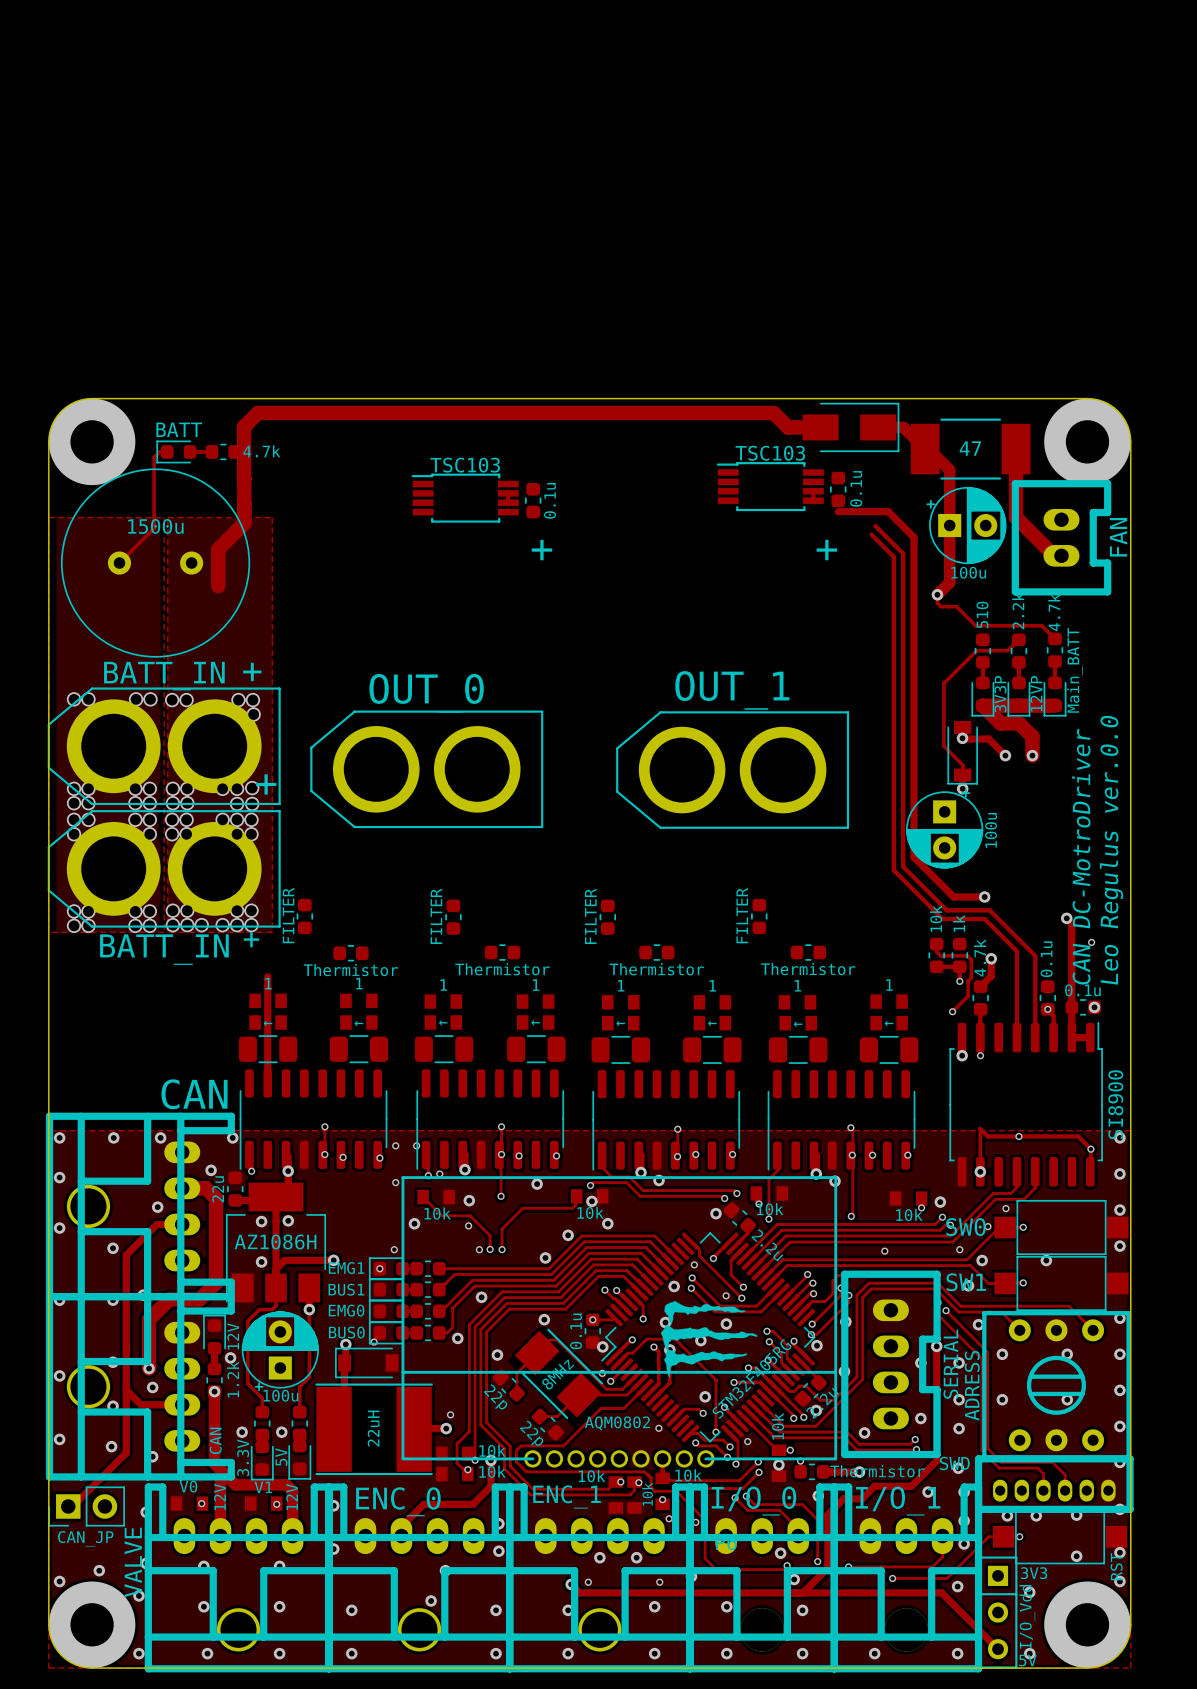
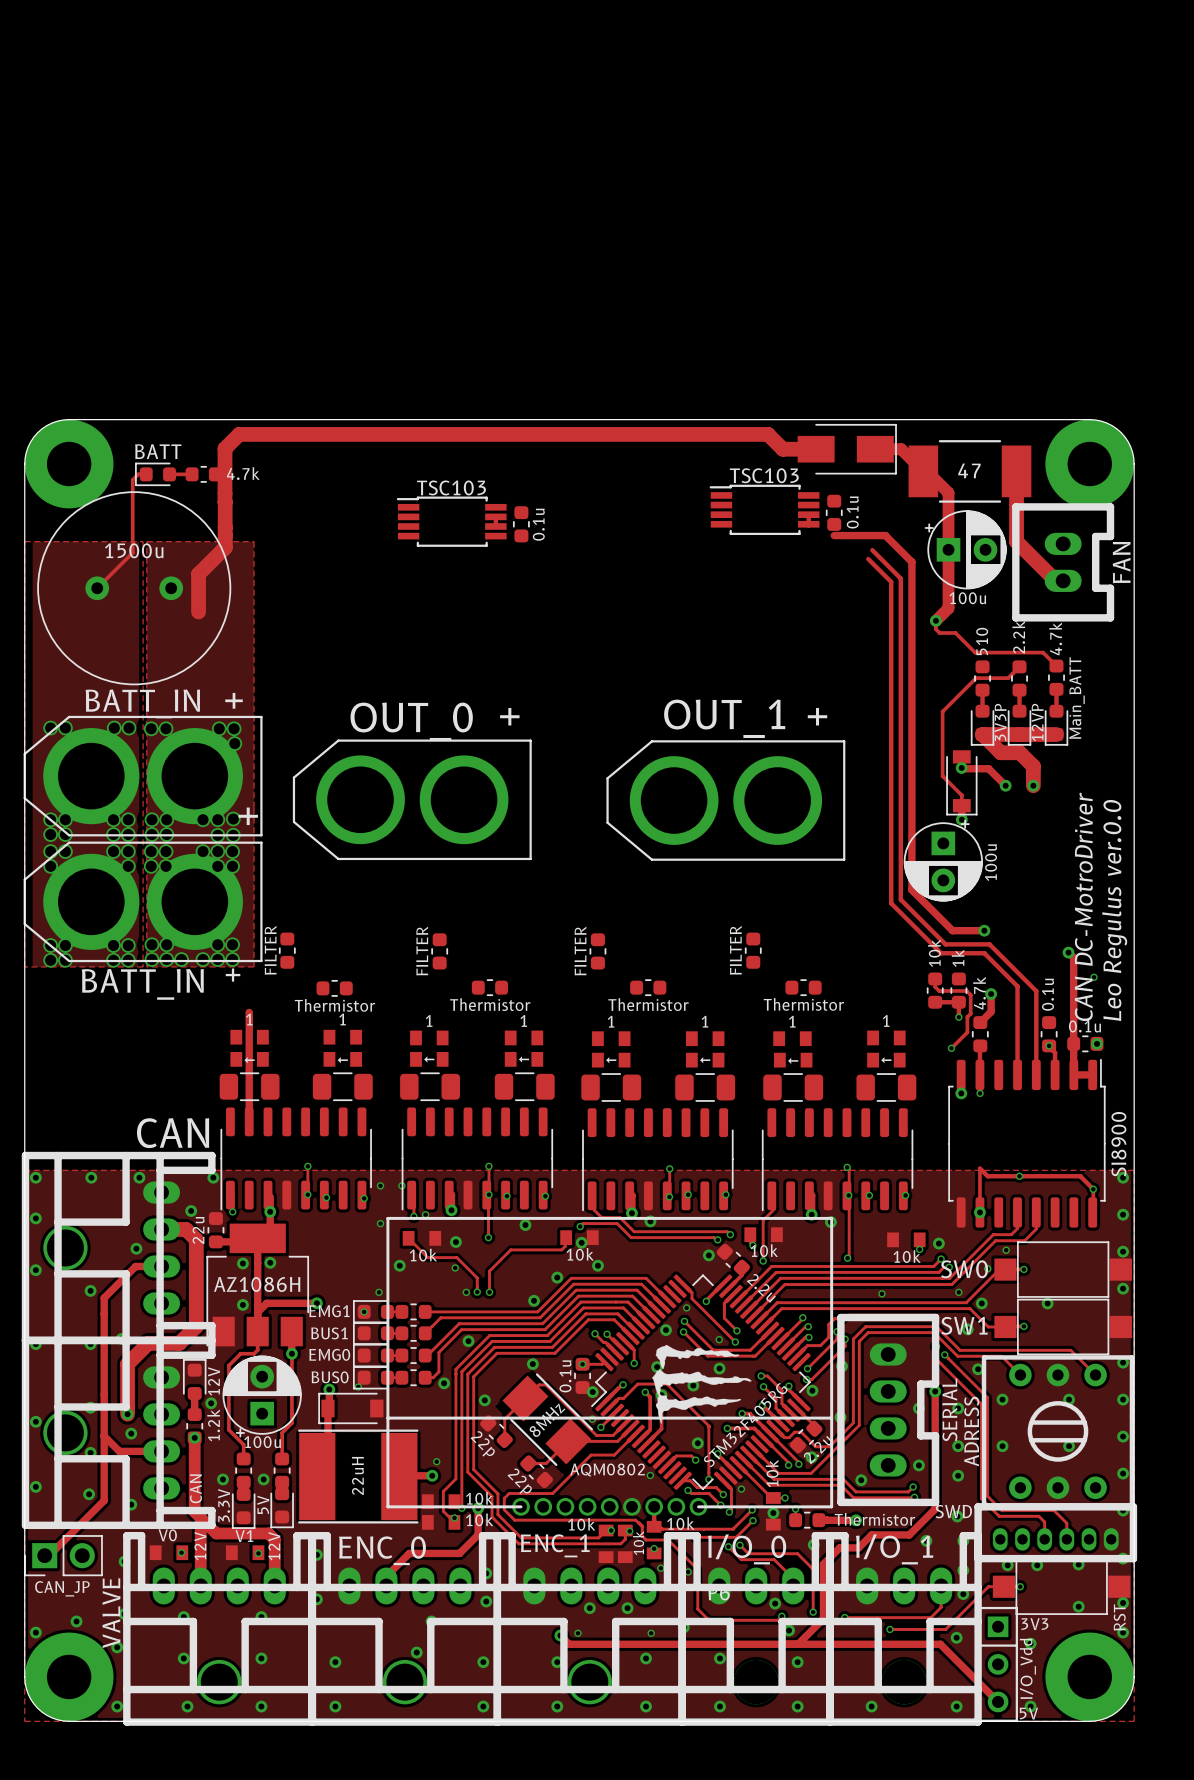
text position: + (541, 550) -> + (509, 716)
text position: + (826, 550) -> + (817, 716)

